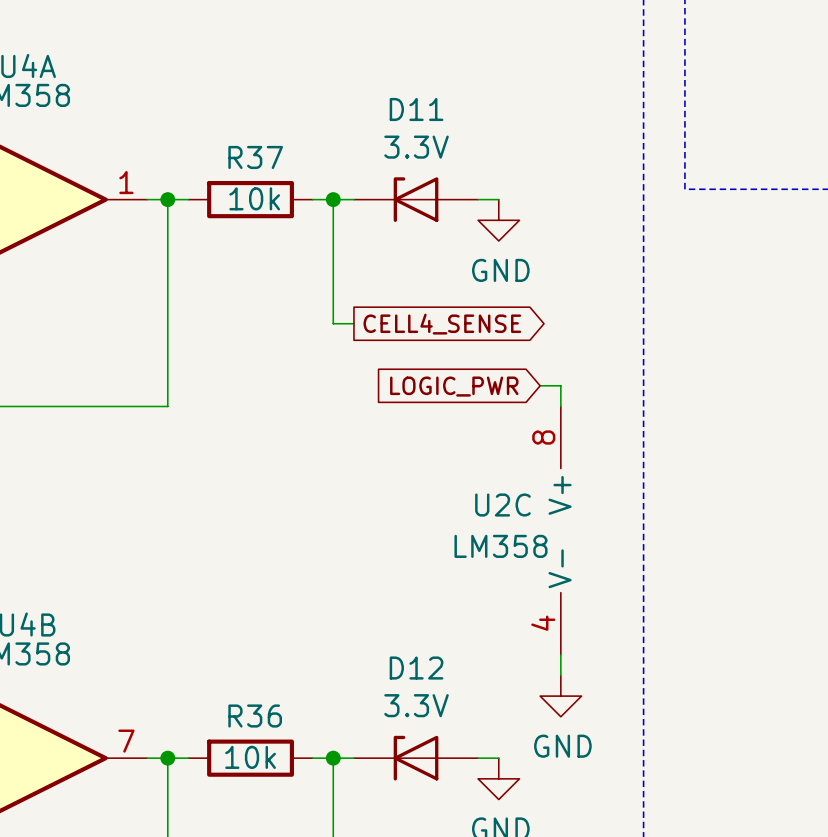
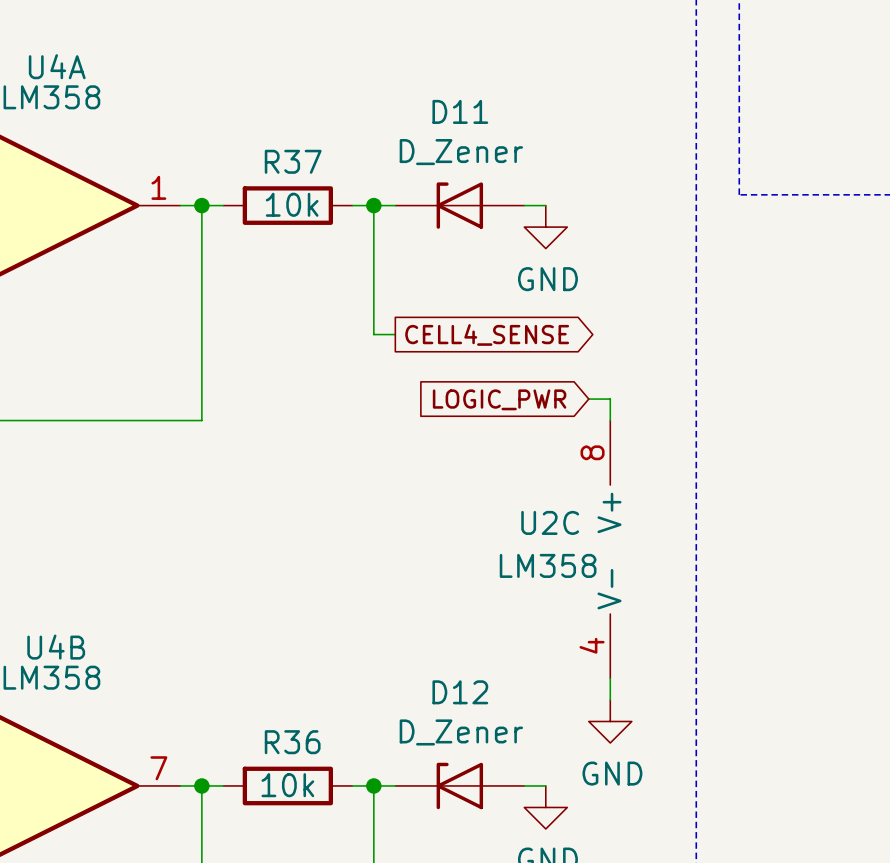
D11 value: 3.3V (416, 147) -> D_Zener (461, 152)
D12 value: 3.3V (416, 705) -> D_Zener (461, 732)

